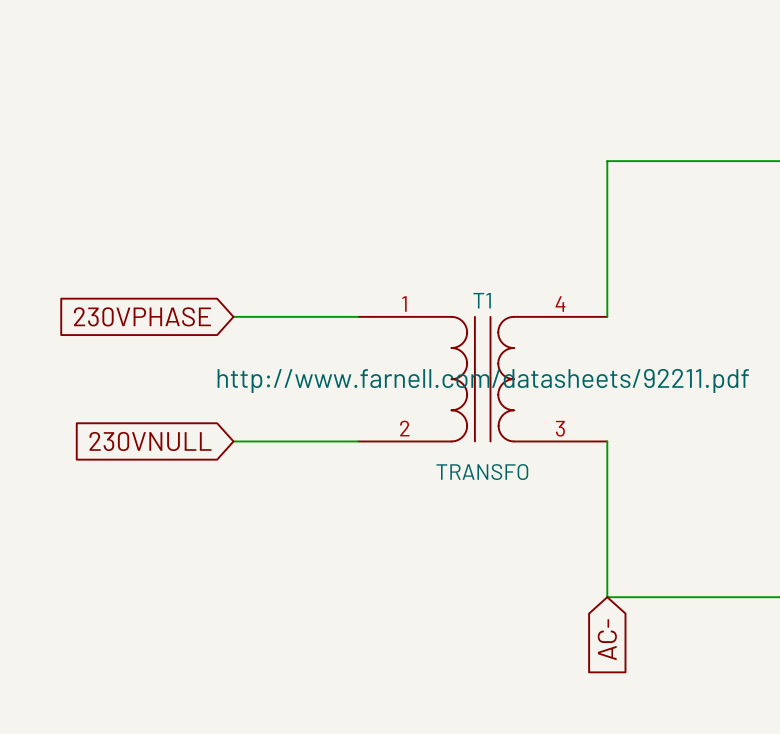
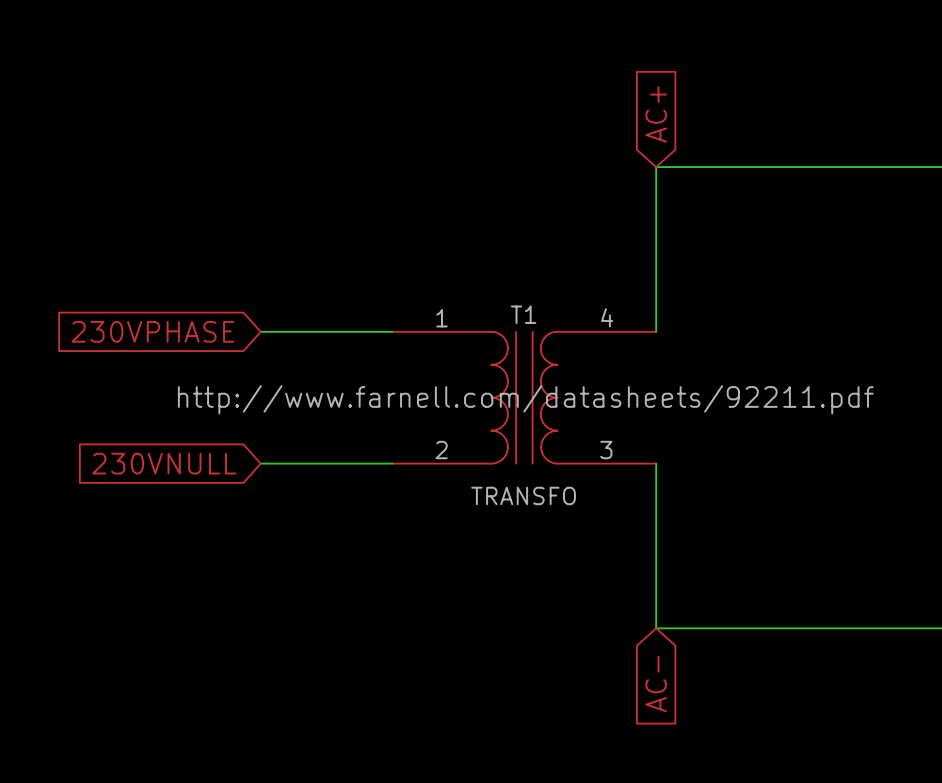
global label: none -> AC+ (656, 114)

